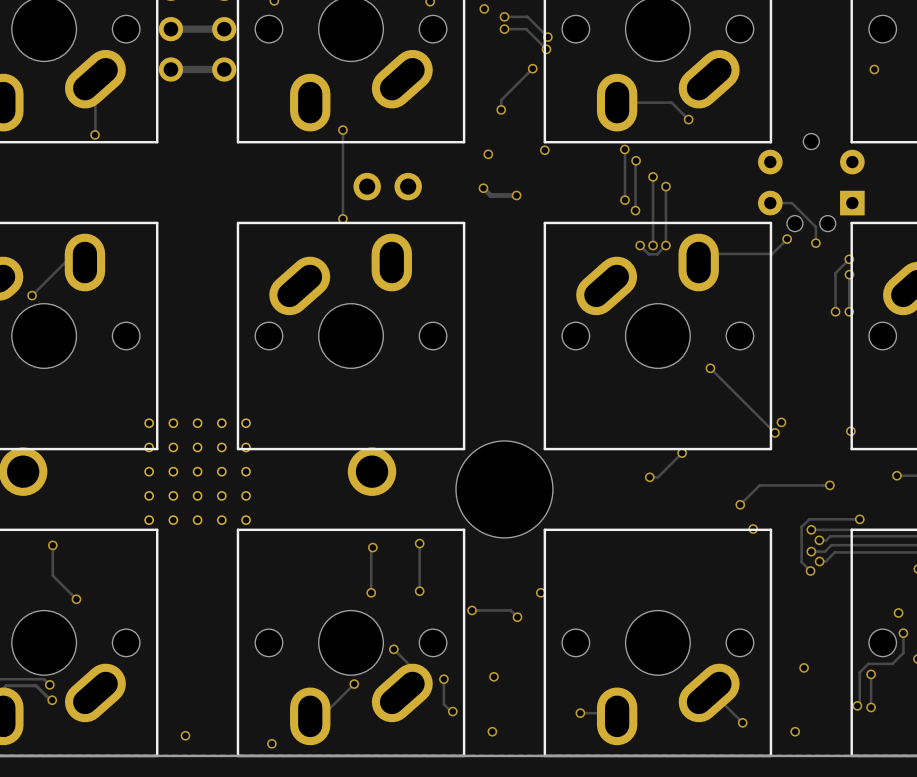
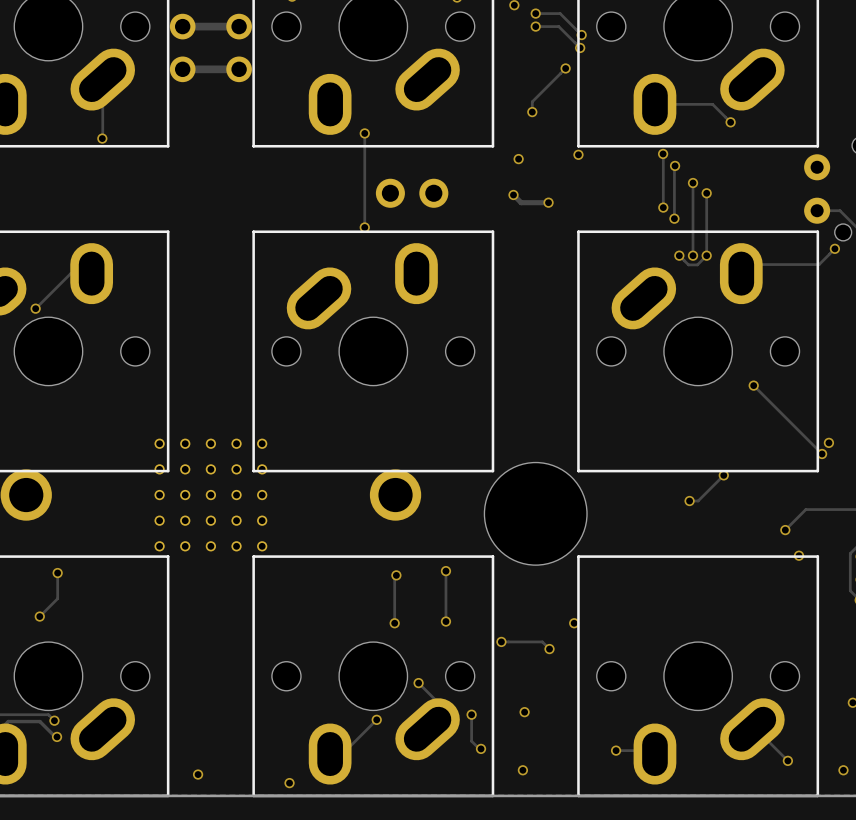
track: (52, 569) (52, 575) (76, 599) -> (57, 598) (39, 616)
via position: (76, 599) -> (39, 616)

